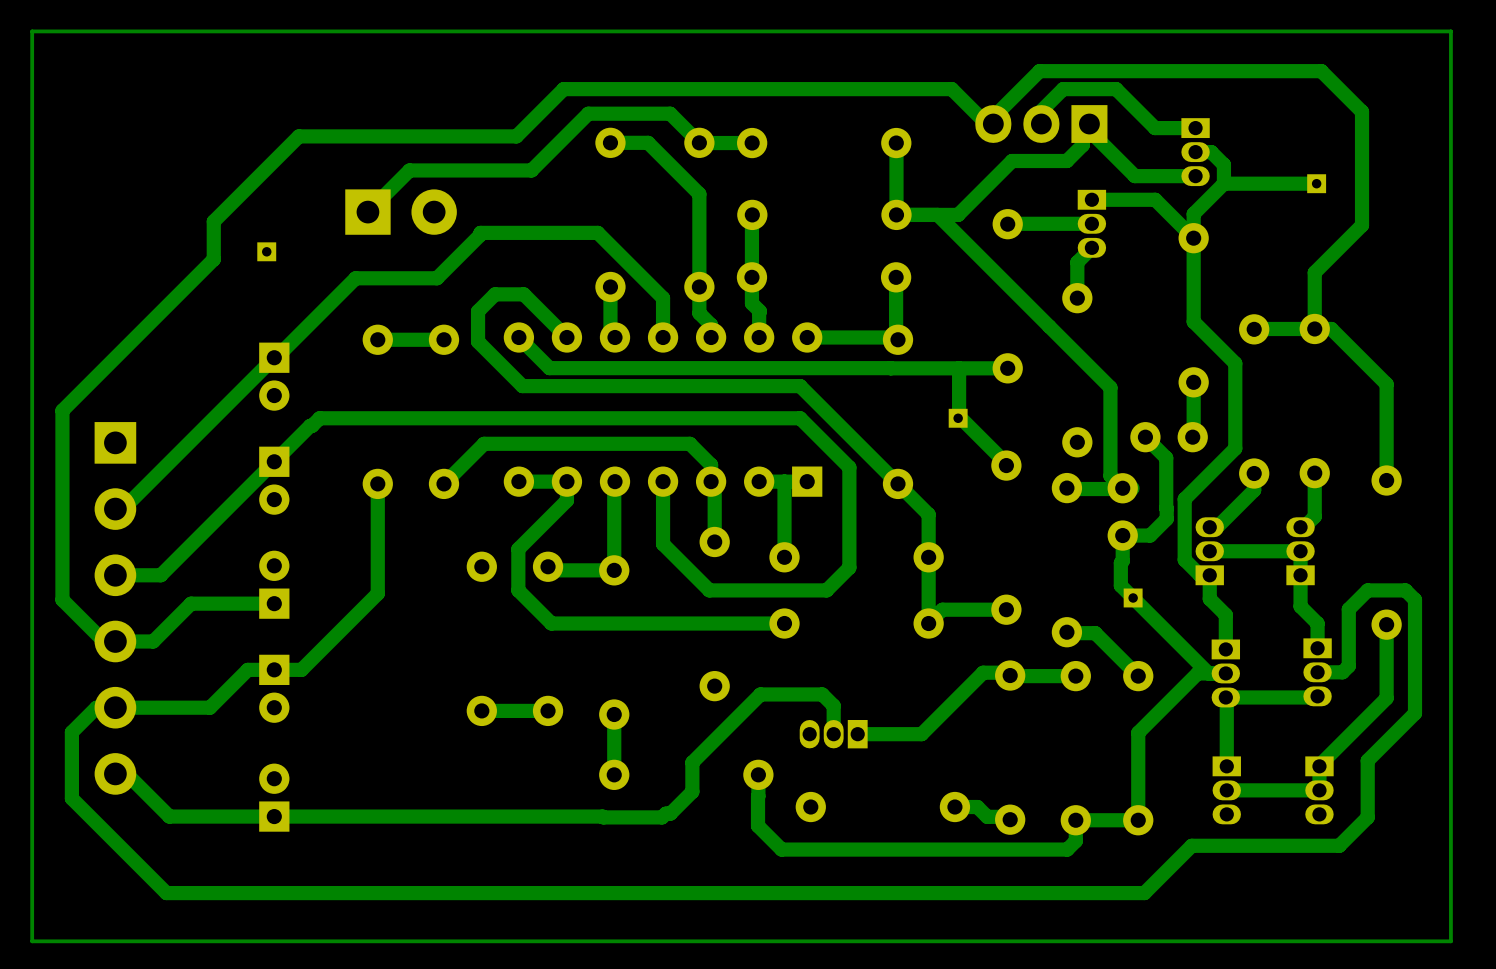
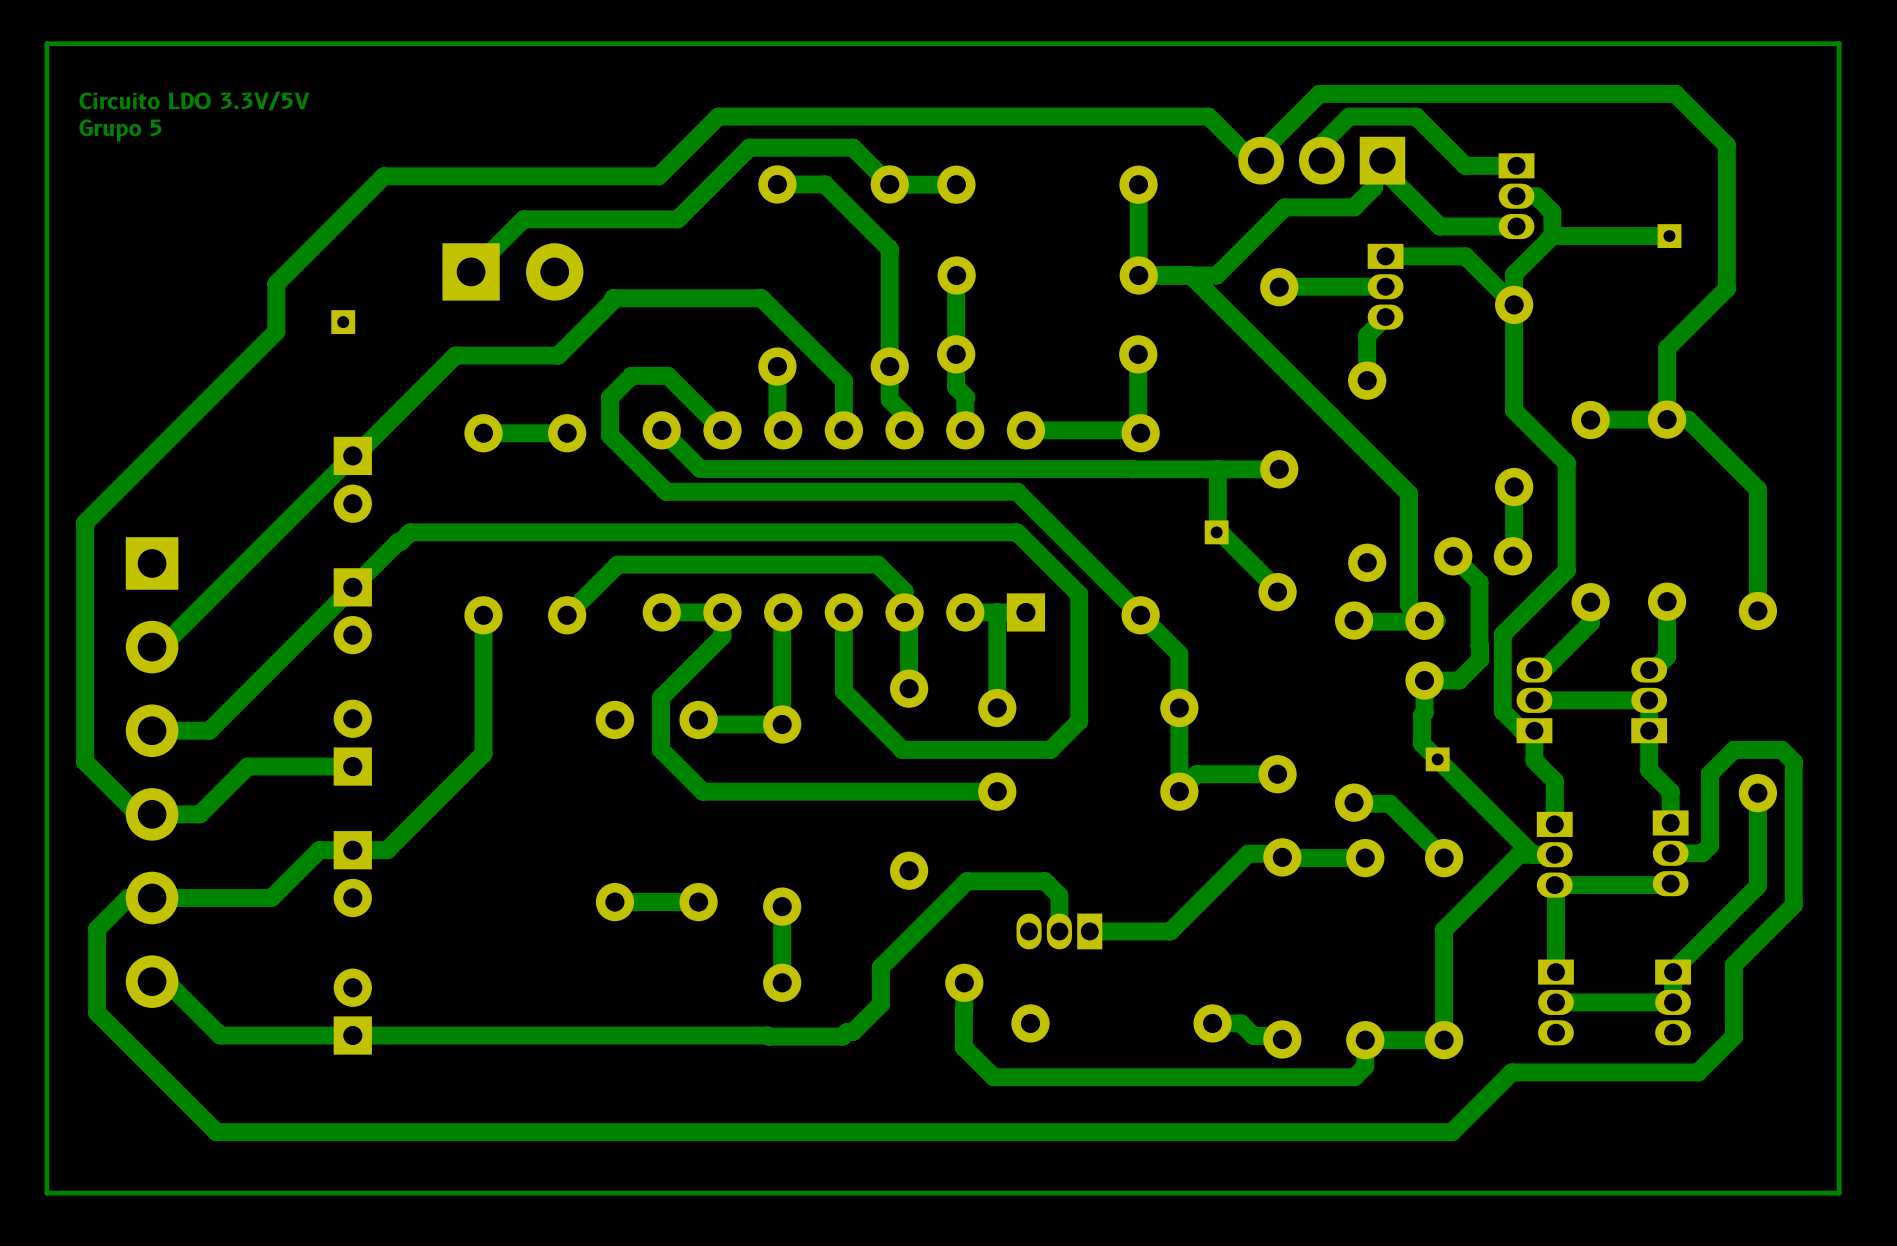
text: none -> Circuito LDO 3.3V/5V (194, 100)
text: none -> Grupo 5 (120, 130)

